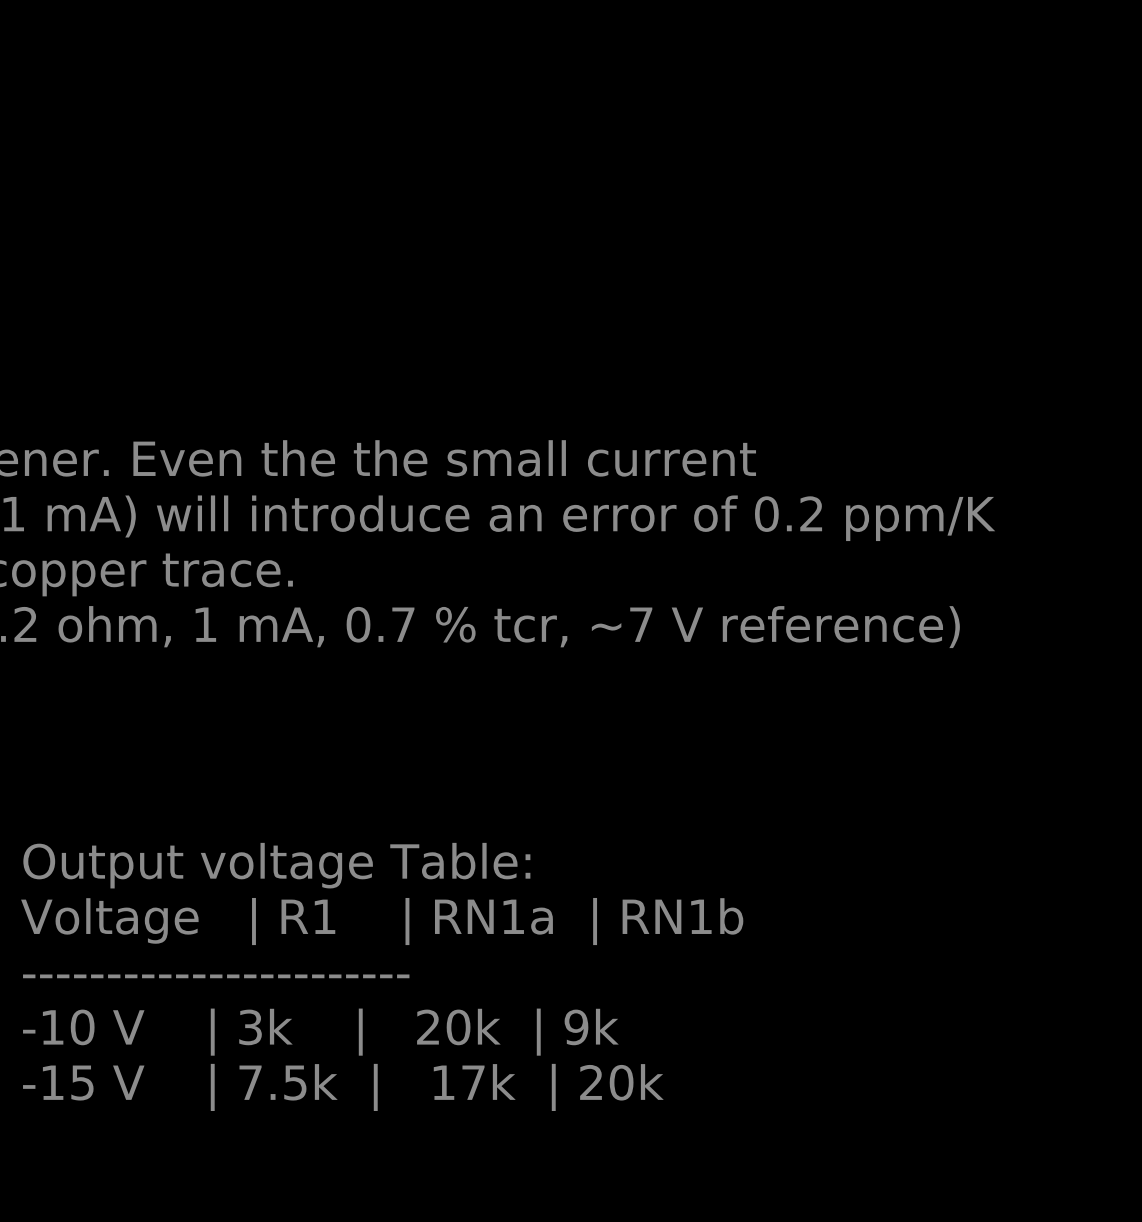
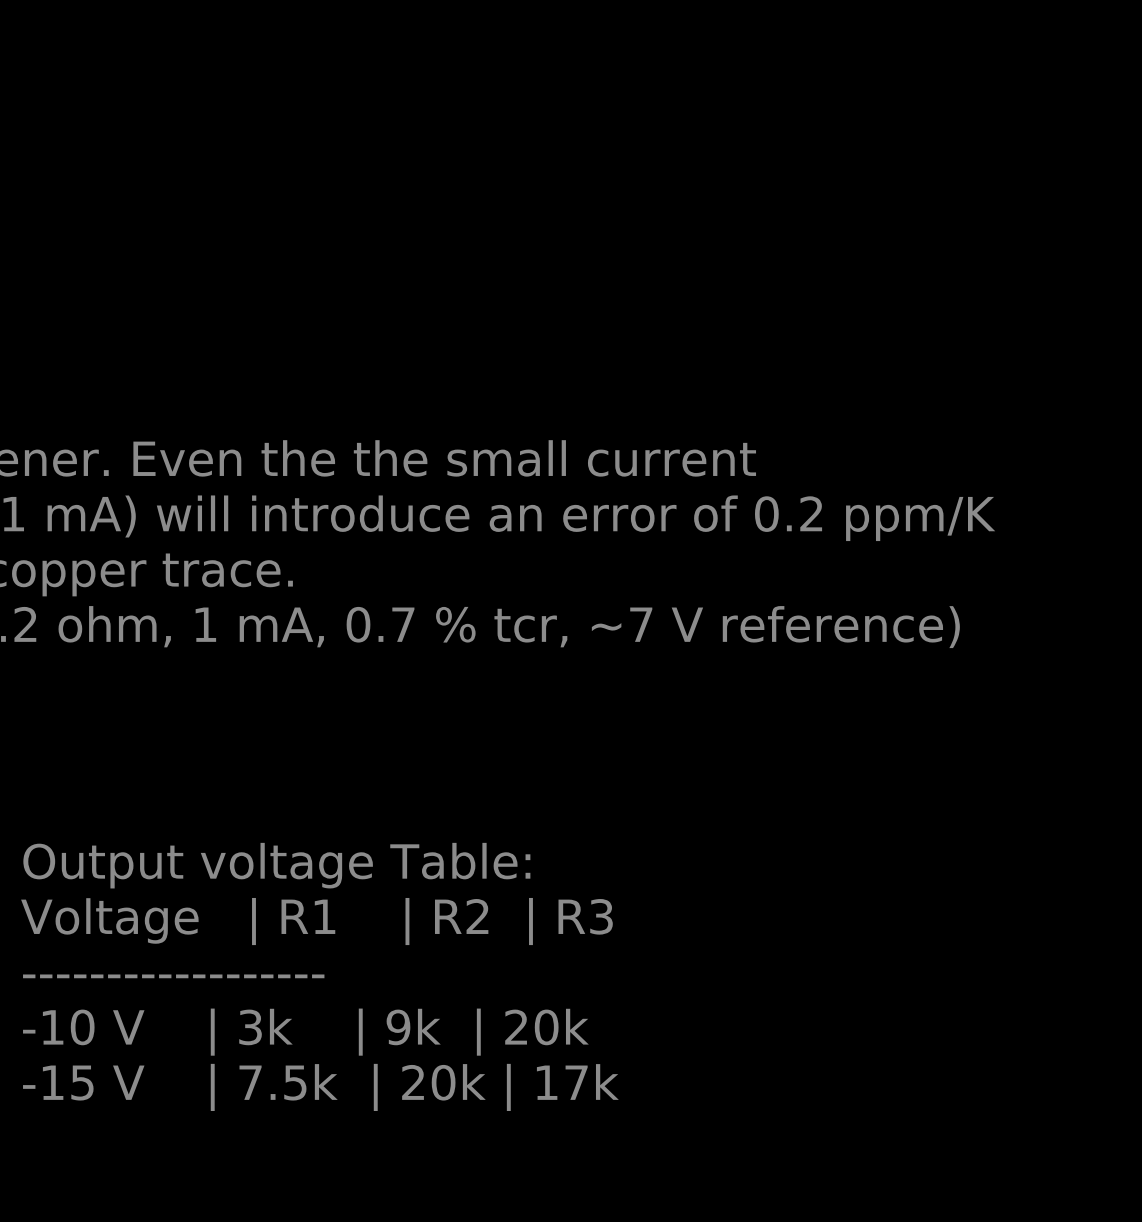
text: Voltage | R1 | RN1a | RN1b (382, 921) -> Voltage | R1 | R2 | R3 (316, 921)
text: ----------------------- (216, 976) -> ------------------ (173, 976)
text: -10 V | 3k | 20k | 9k (320, 1032) -> -10 V | 3k | 9k | 20k (305, 1032)
text: -15 V | 7.5k | 17k | 20k (343, 1087) -> -15 V | 7.5k | 20k | 17k (320, 1087)

